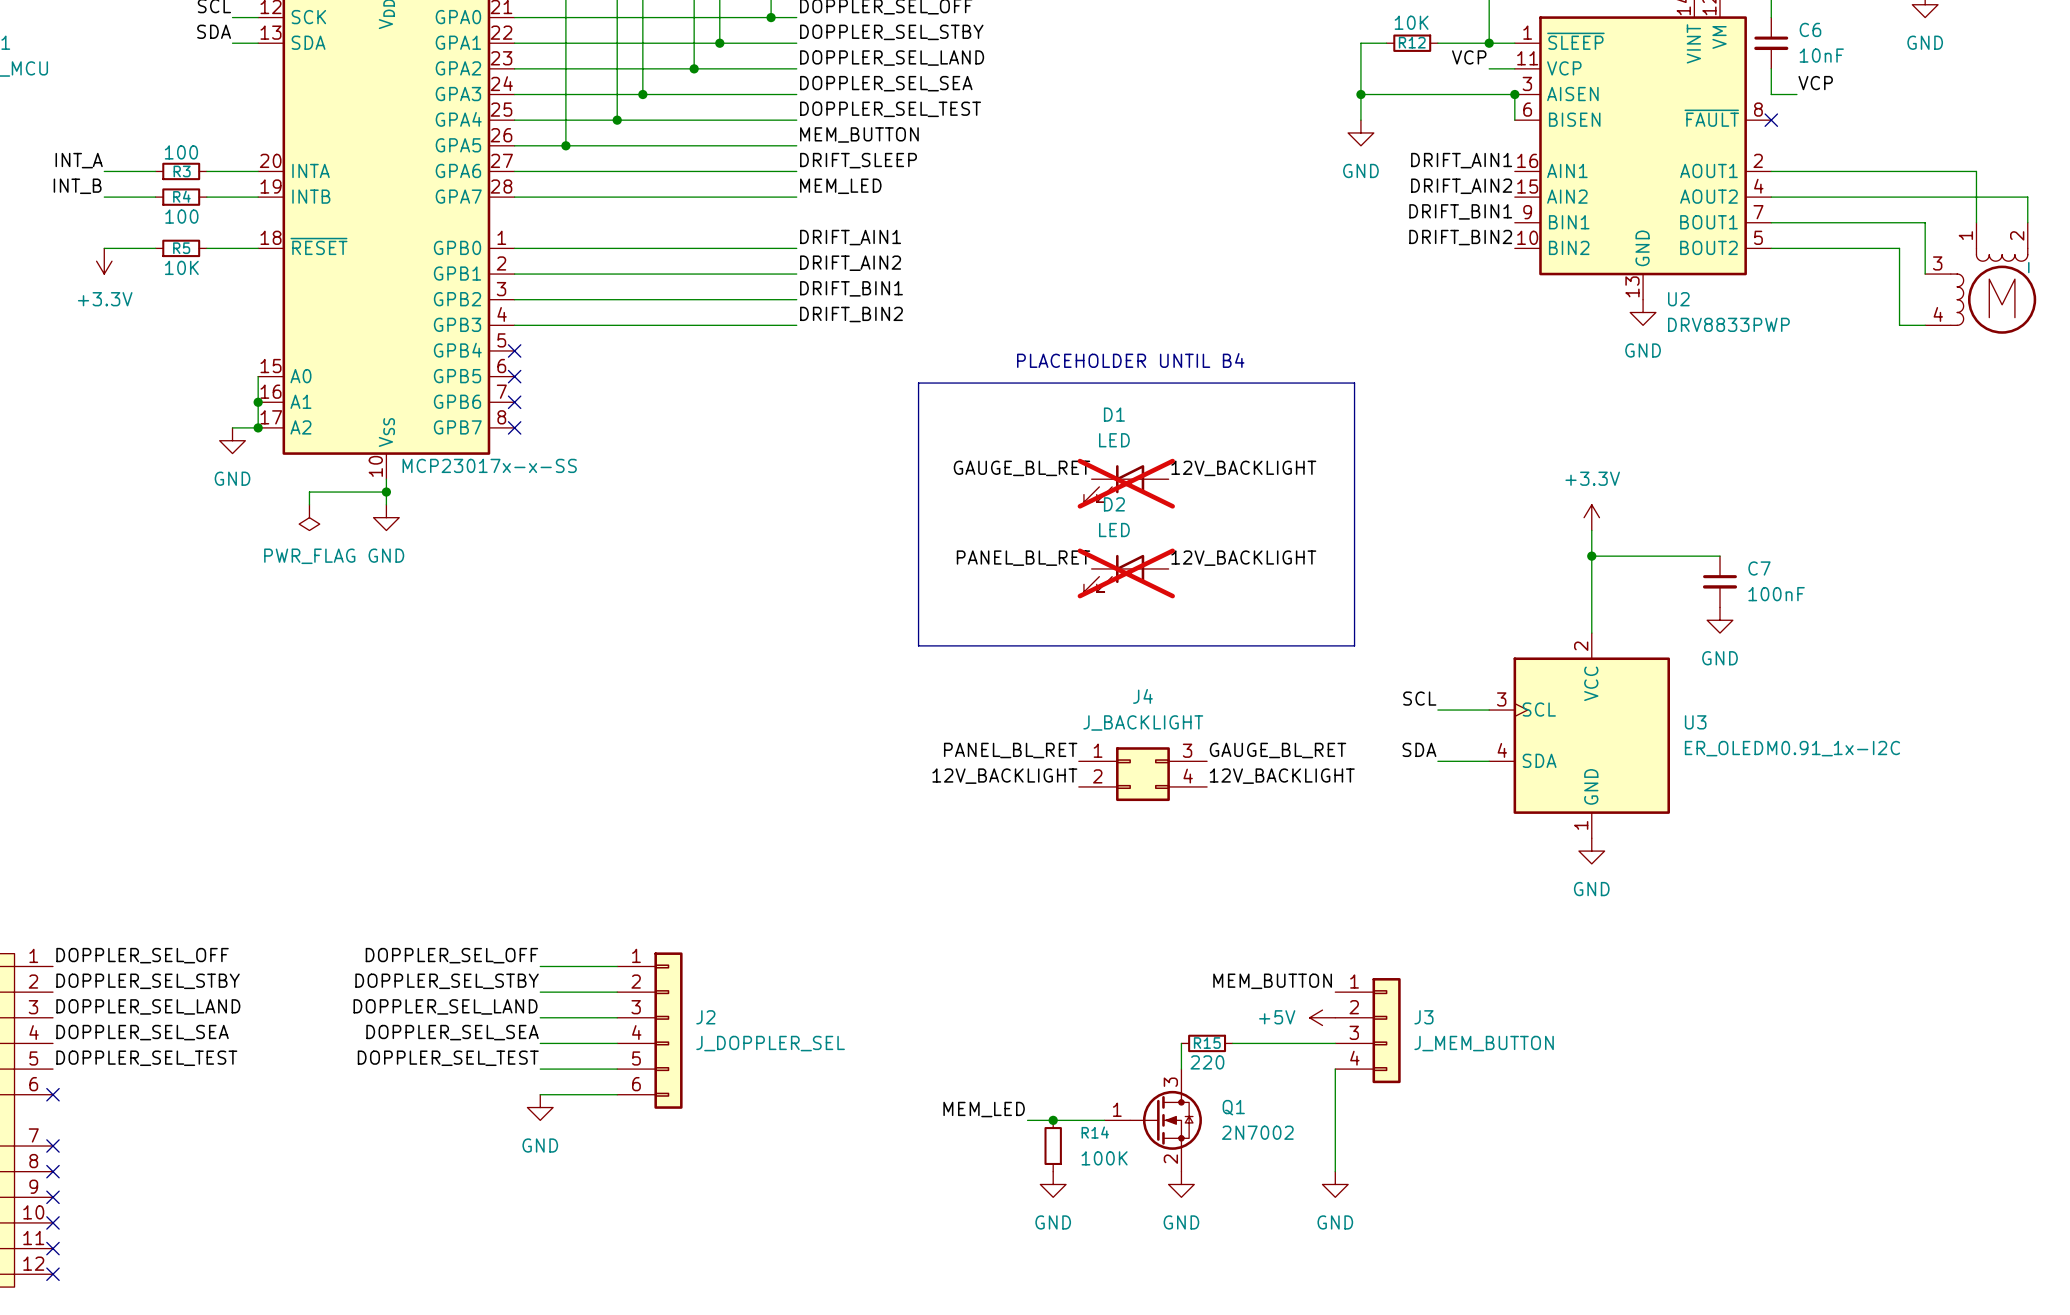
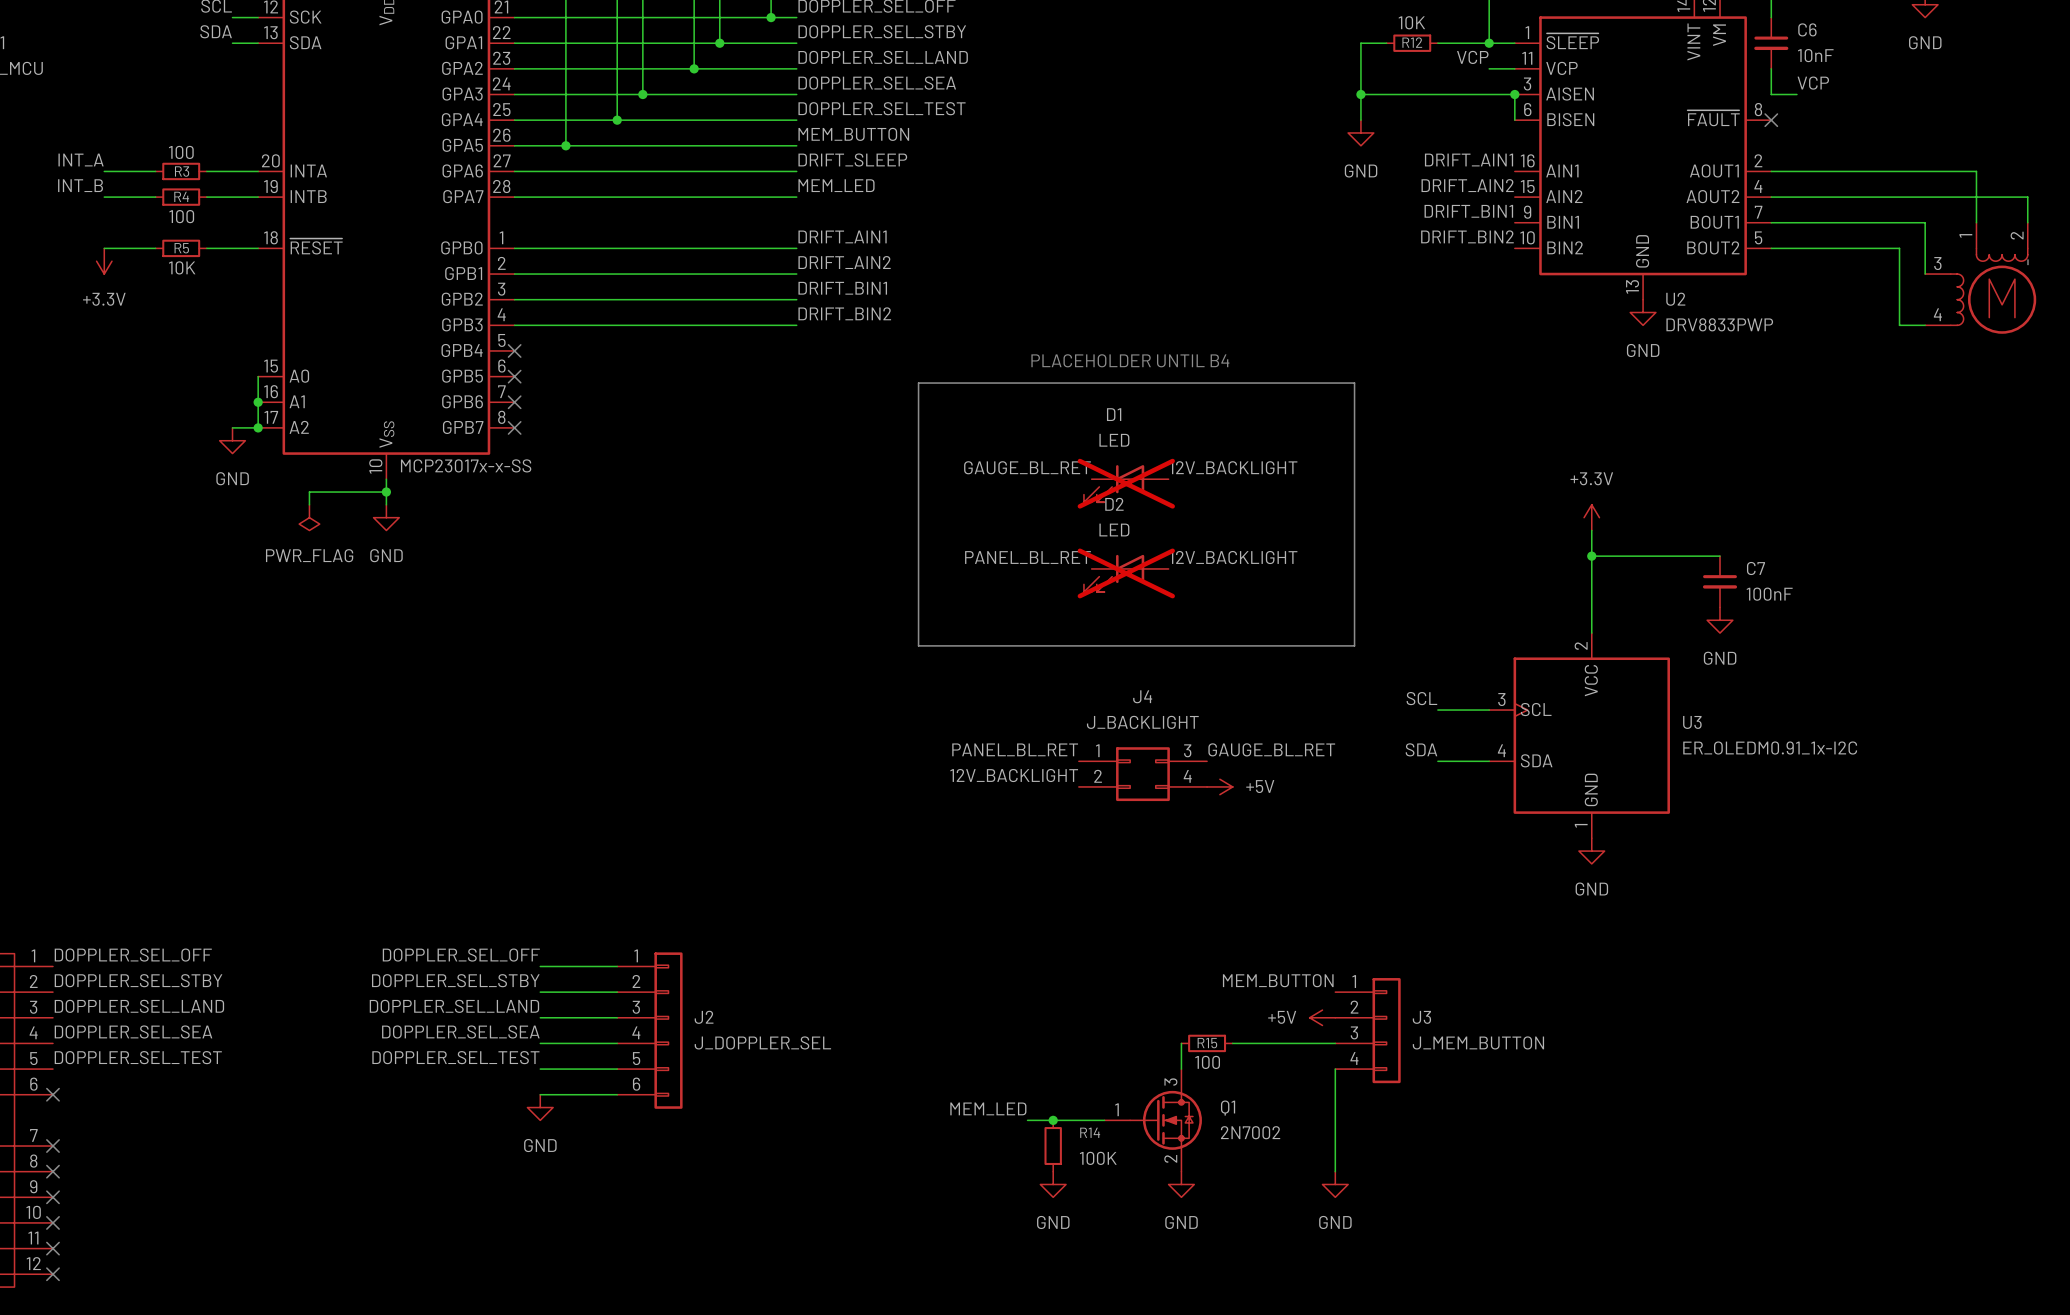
label: 12V_BACKLIGHT (1282, 776) -> none
power symbol: none -> +5V (1219, 786)
R15 value: 220 (1207, 1062) -> 100 (1207, 1062)

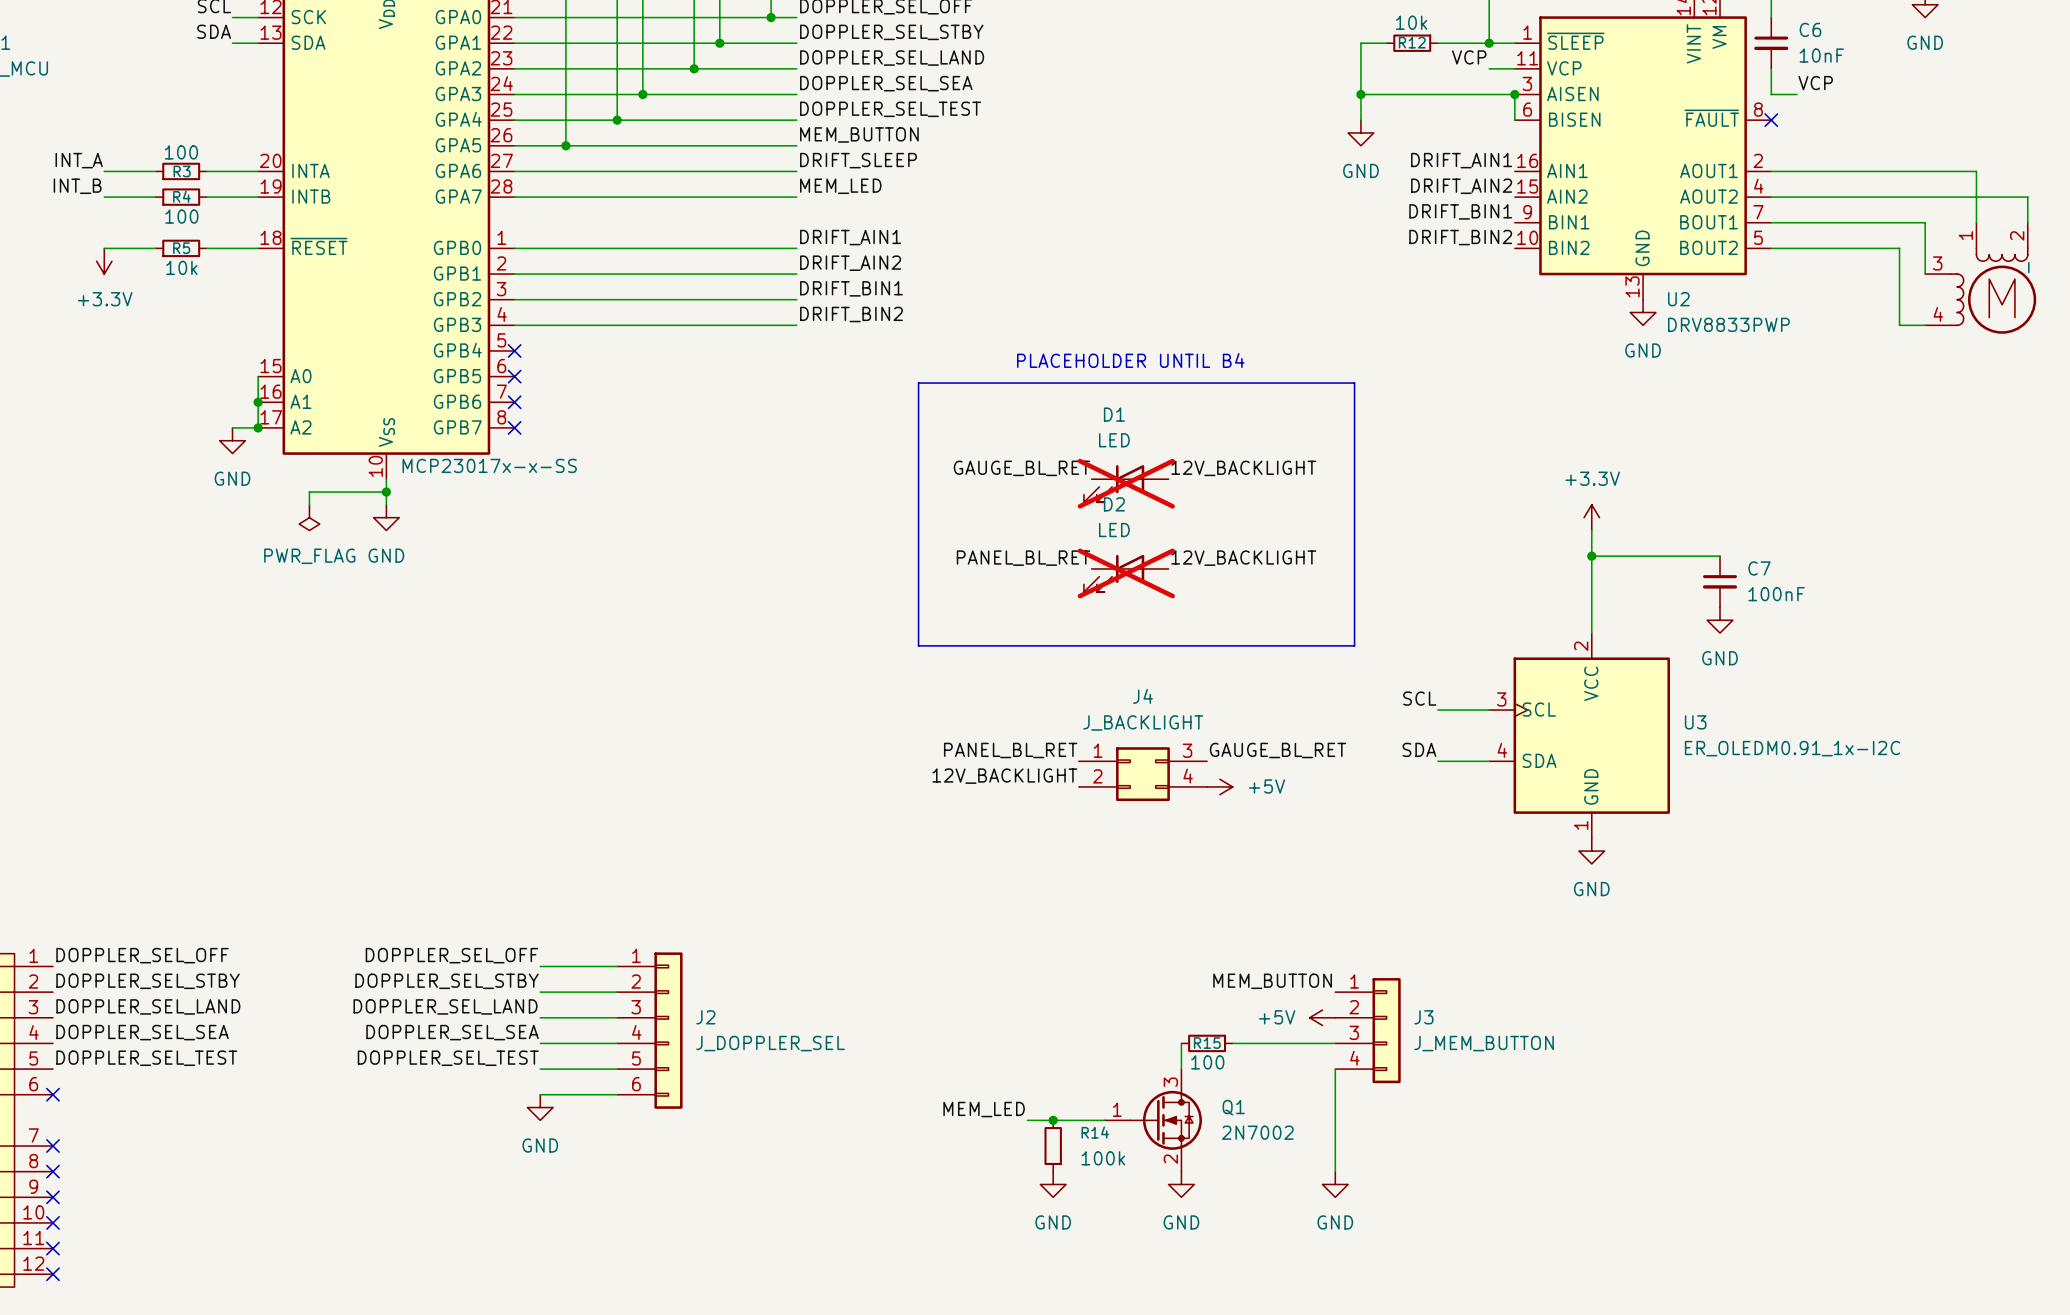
R12 value: 10K (1411, 22) -> 10k (1411, 22)
R5 value: 10K (182, 267) -> 10k (181, 267)
R14 value: 100K (1098, 1158) -> 100k (1103, 1158)

